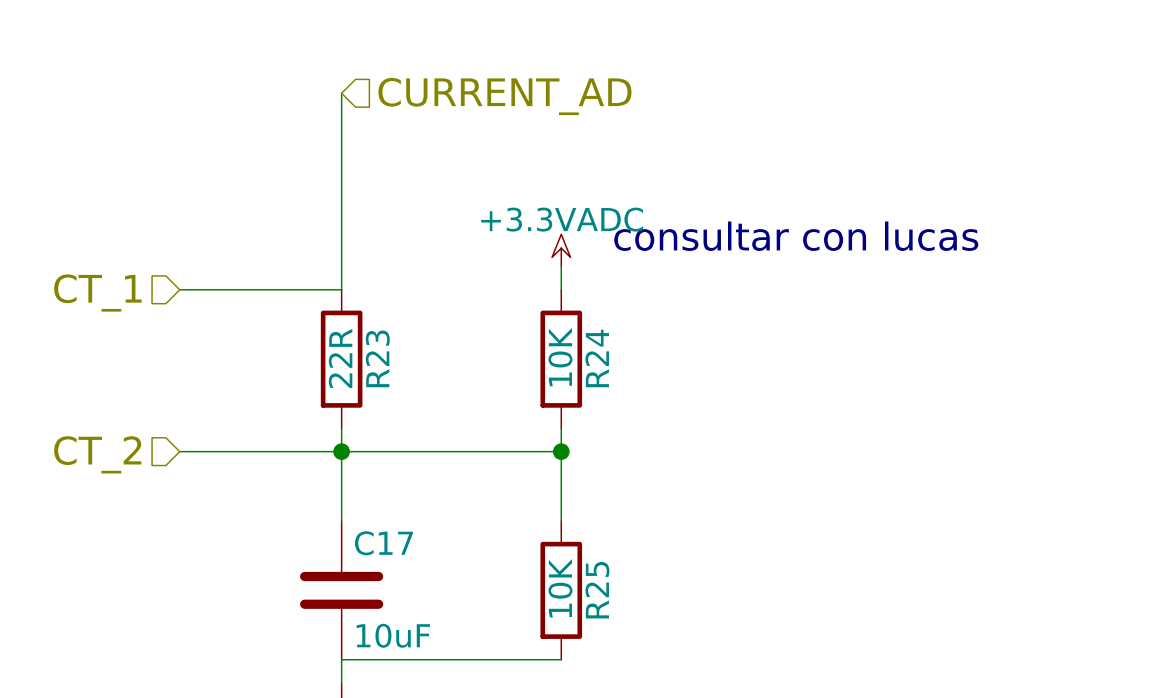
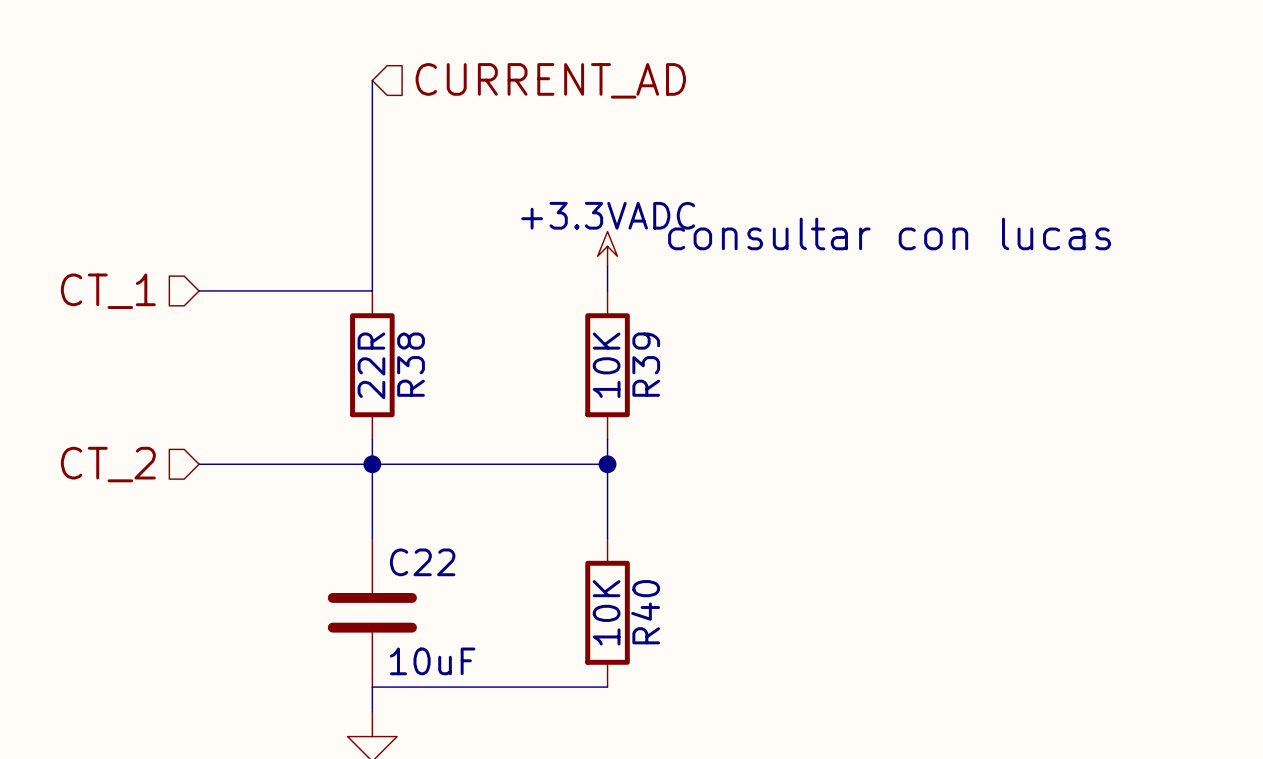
R23 name: R23 (377, 358) -> R38 (411, 364)
R24 name: R24 (597, 358) -> R39 (646, 364)
C17 name: C17 (383, 543) -> C22 (422, 562)
R25 name: R25 (597, 590) -> R40 (645, 612)

